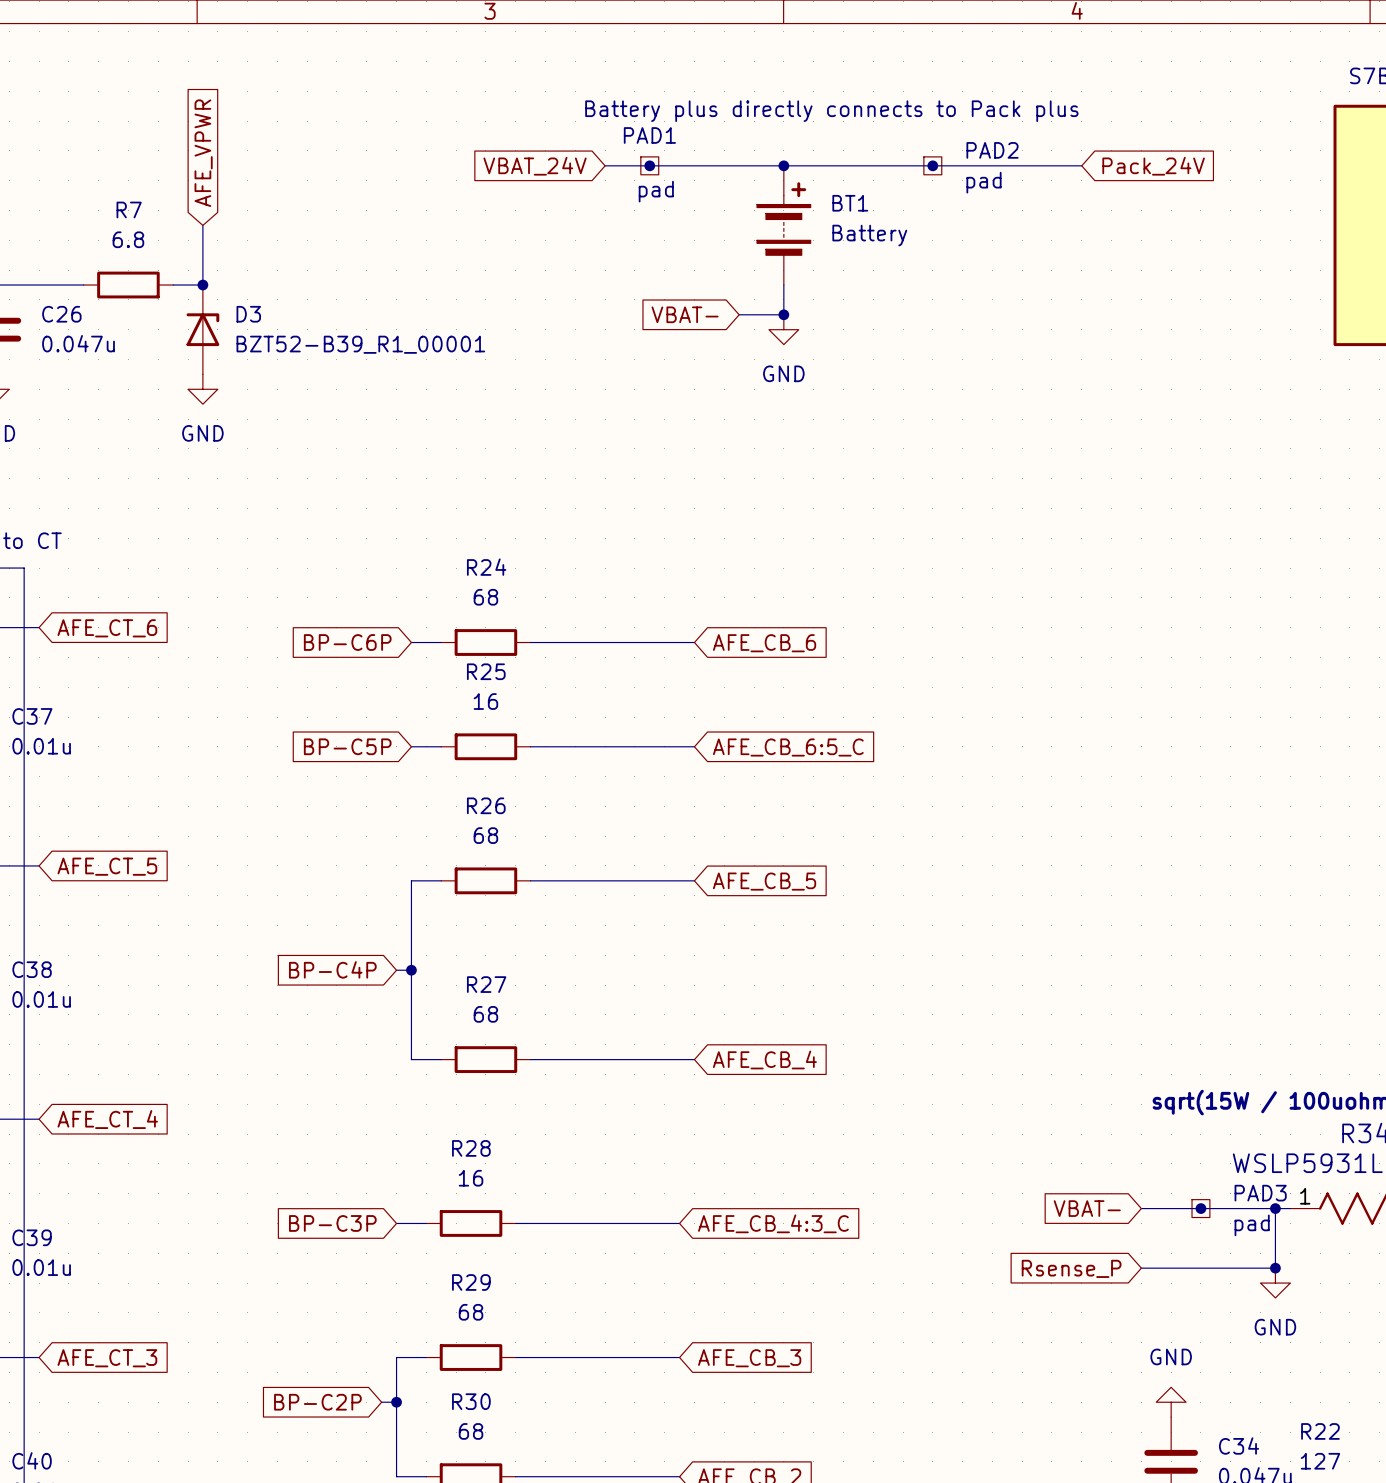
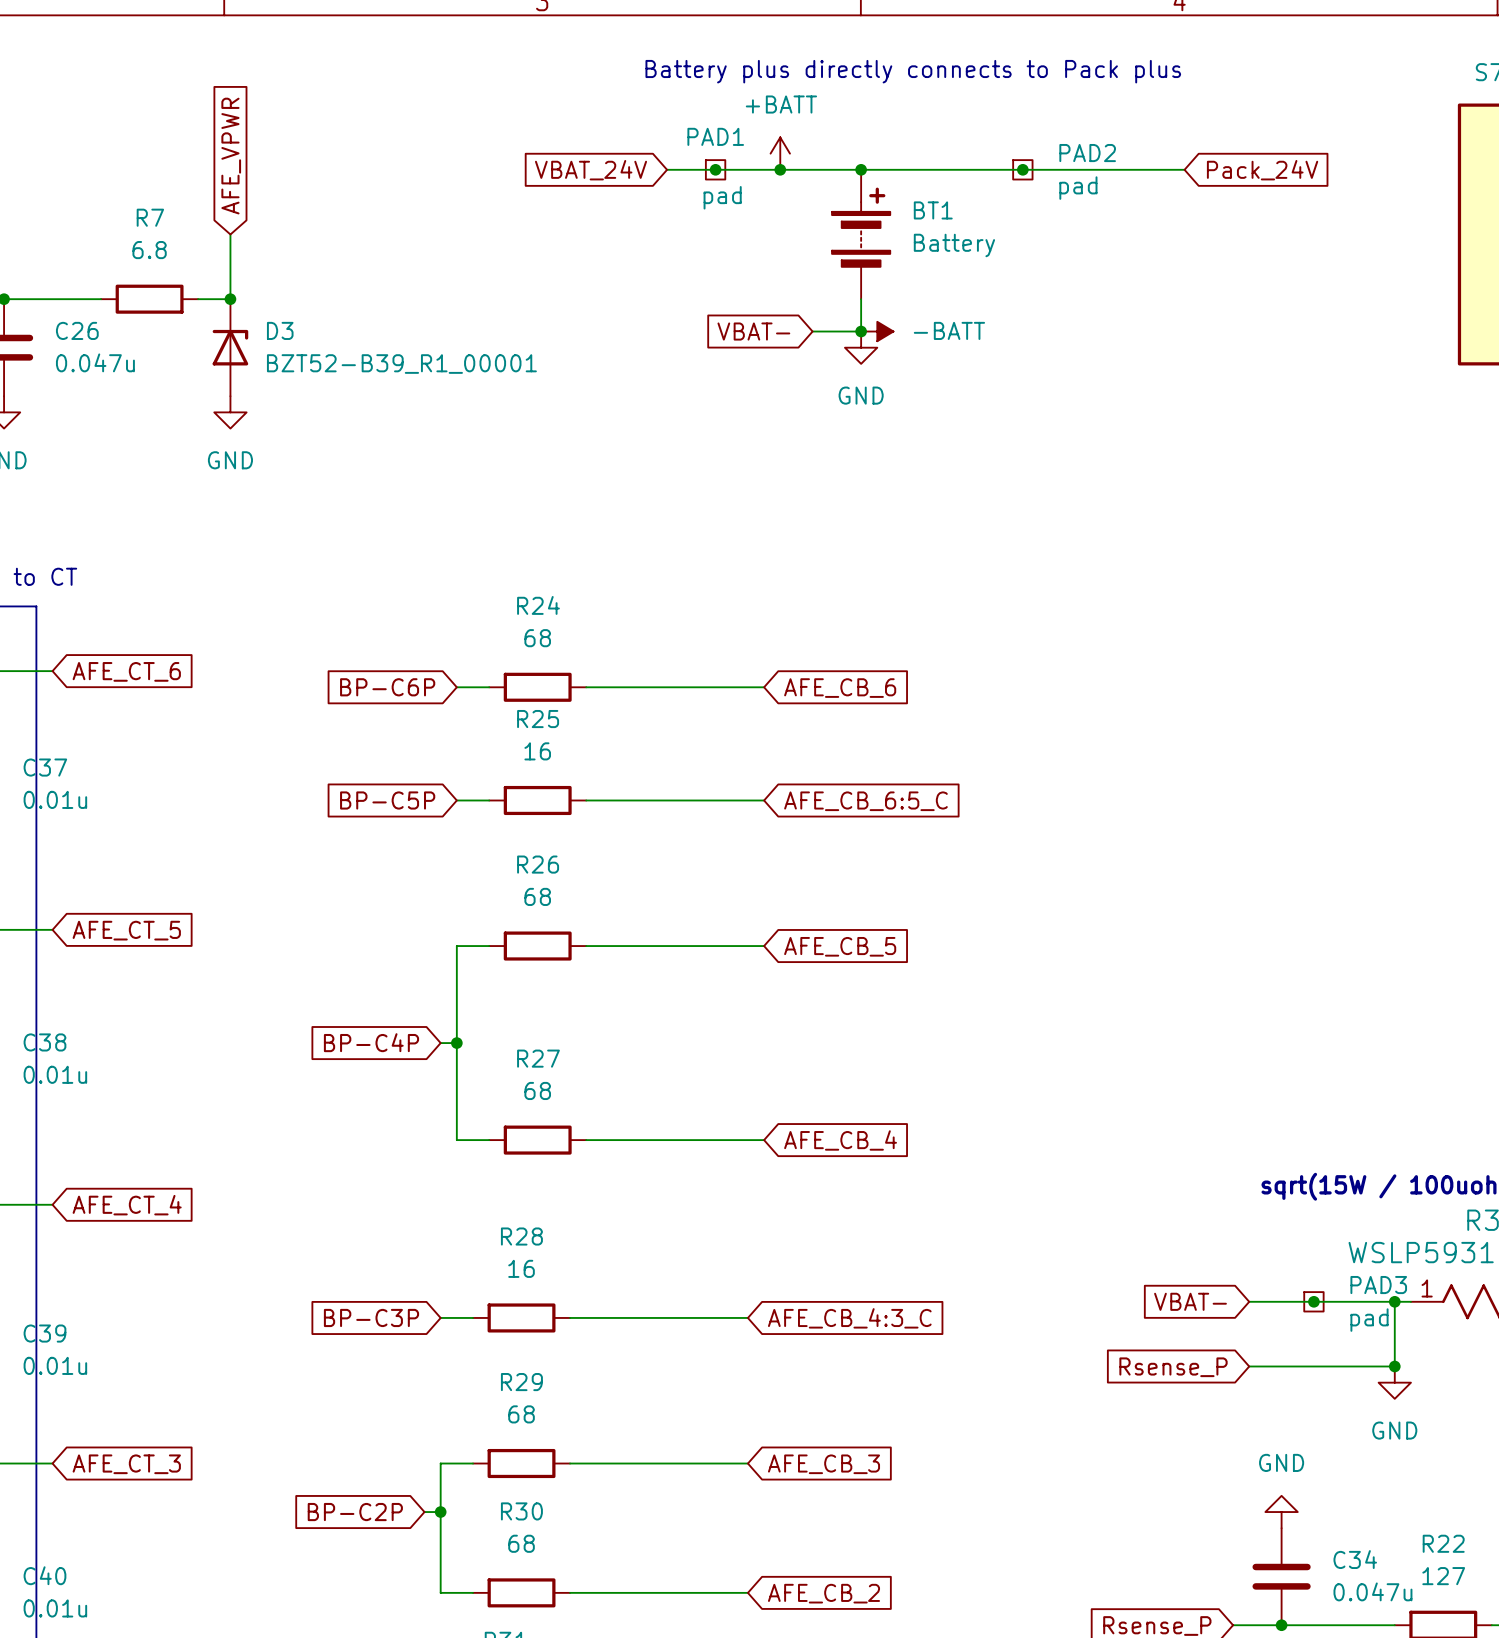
text position: Battery plus directly connects to Pack plus (831, 111) -> Battery plus directly connects to Pack plus (913, 71)
power symbol: none -> +BATT (780, 153)
junction: none -> (780, 169)
power symbol: none -> -BATT (877, 331)

